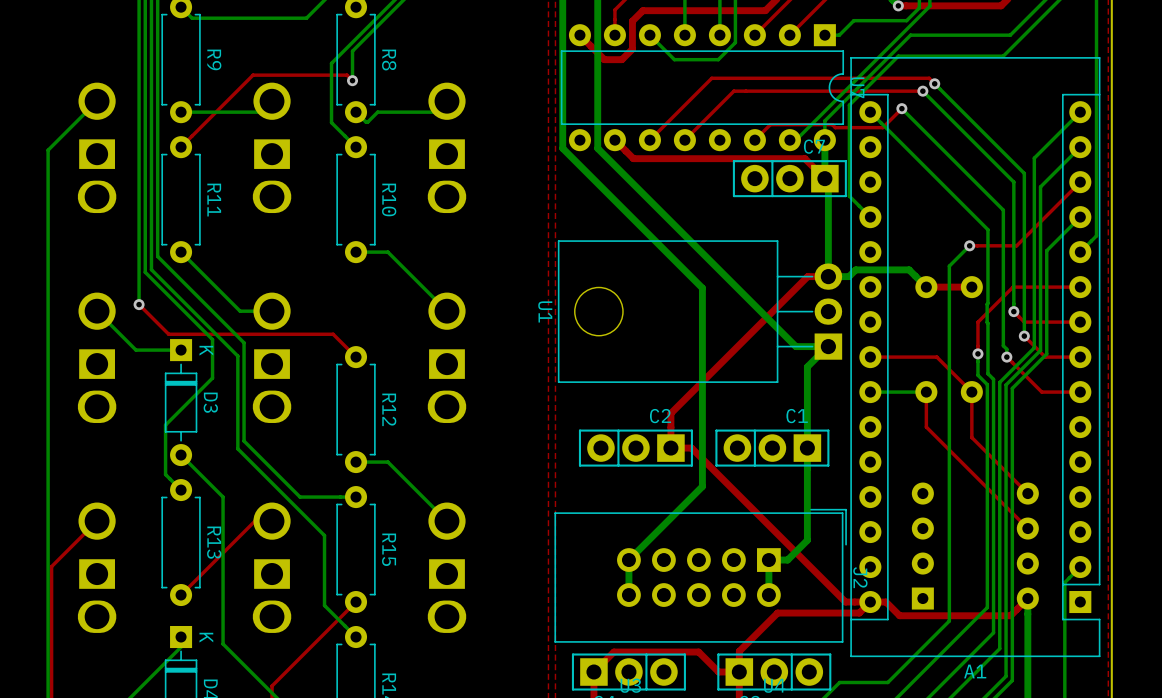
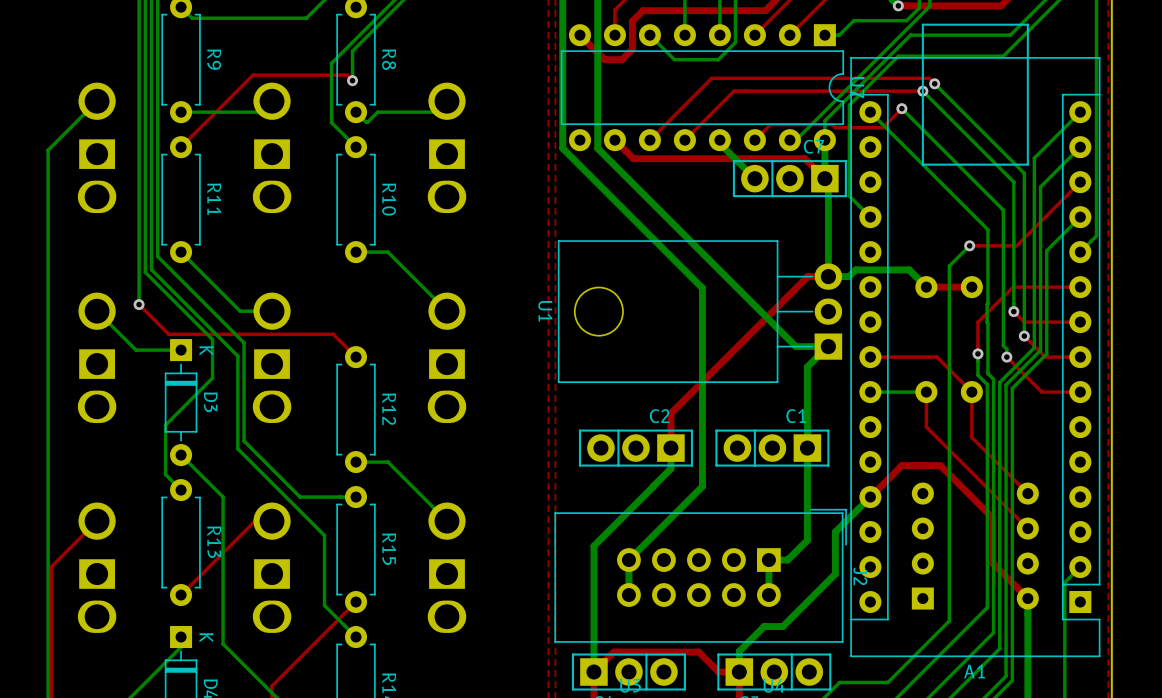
A1 footprint: [850, 57, 1101, 658] -> [850, 23, 1101, 658]
bottom track: none -> (719, 140) (719, 143) (754, 178)
bottom track: none -> (670, 448) (670, 468) (593, 546) (593, 672)
top track: (670, 448) (691, 448) (845, 602) (885, 602) (899, 615) (1010, 615) (1027, 598) -> (870, 497) (901, 465) (940, 465) (992, 518) (992, 563) (1027, 598)
bottom track: none -> (870, 497) (835, 532) (835, 574) (782, 626) (764, 626) (739, 651) (739, 672)
top track: (870, 602) (859, 613) (777, 613) (739, 651) (739, 672) -> none

